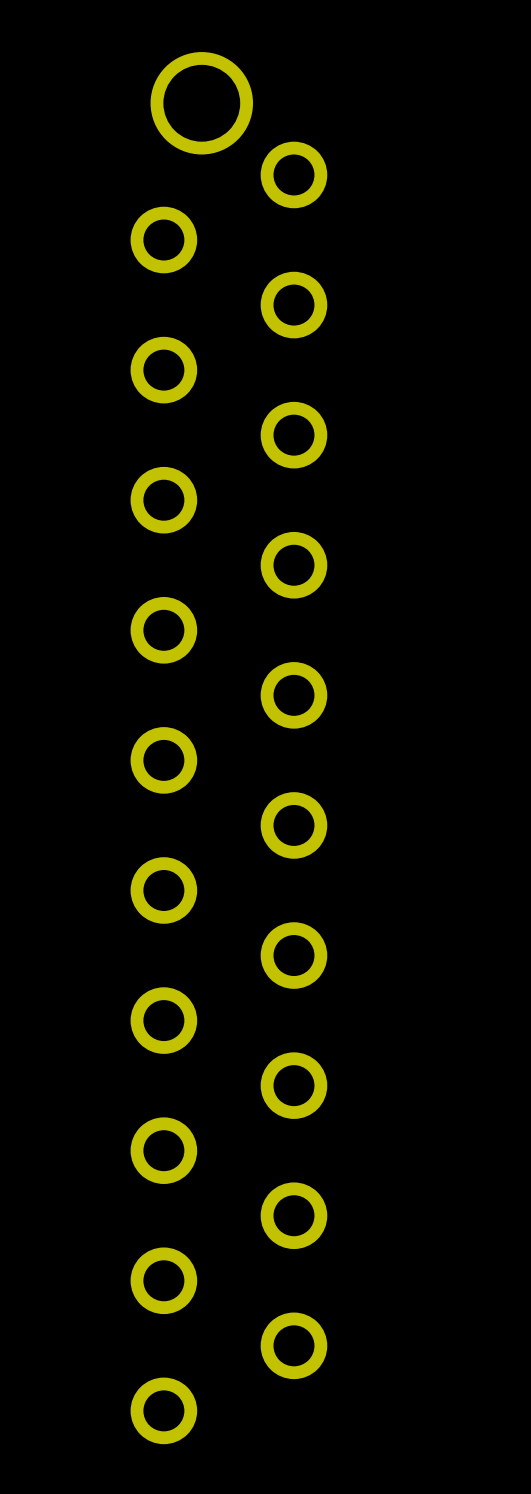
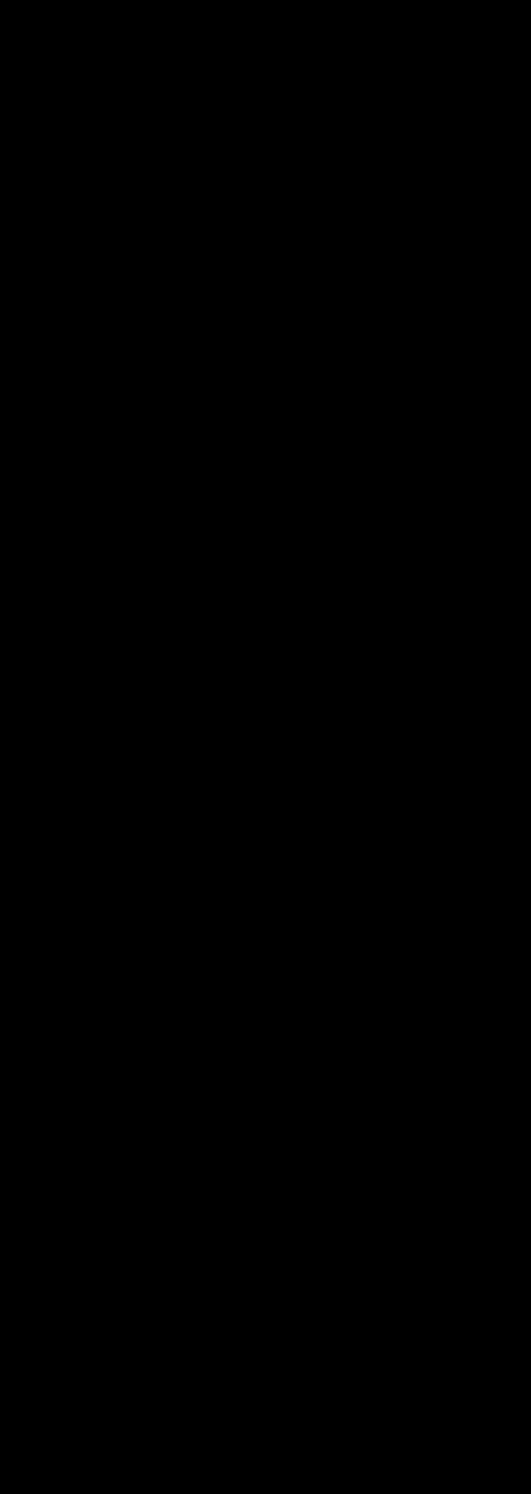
part: (228, 748) -> none

